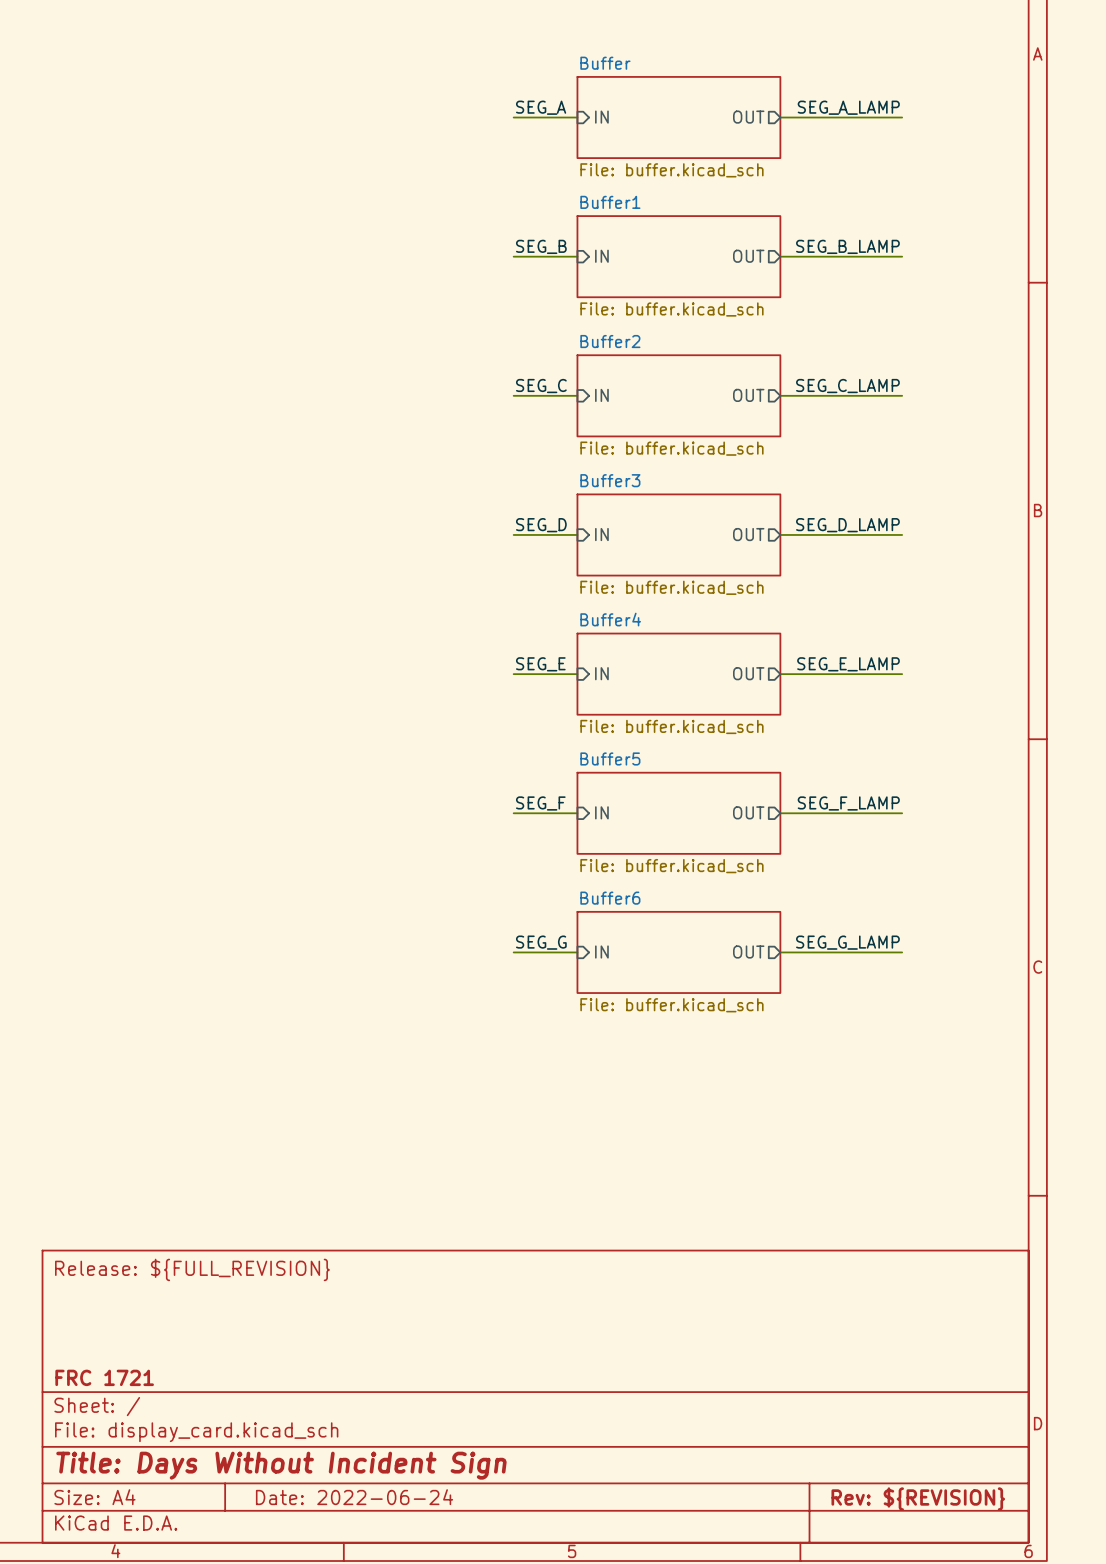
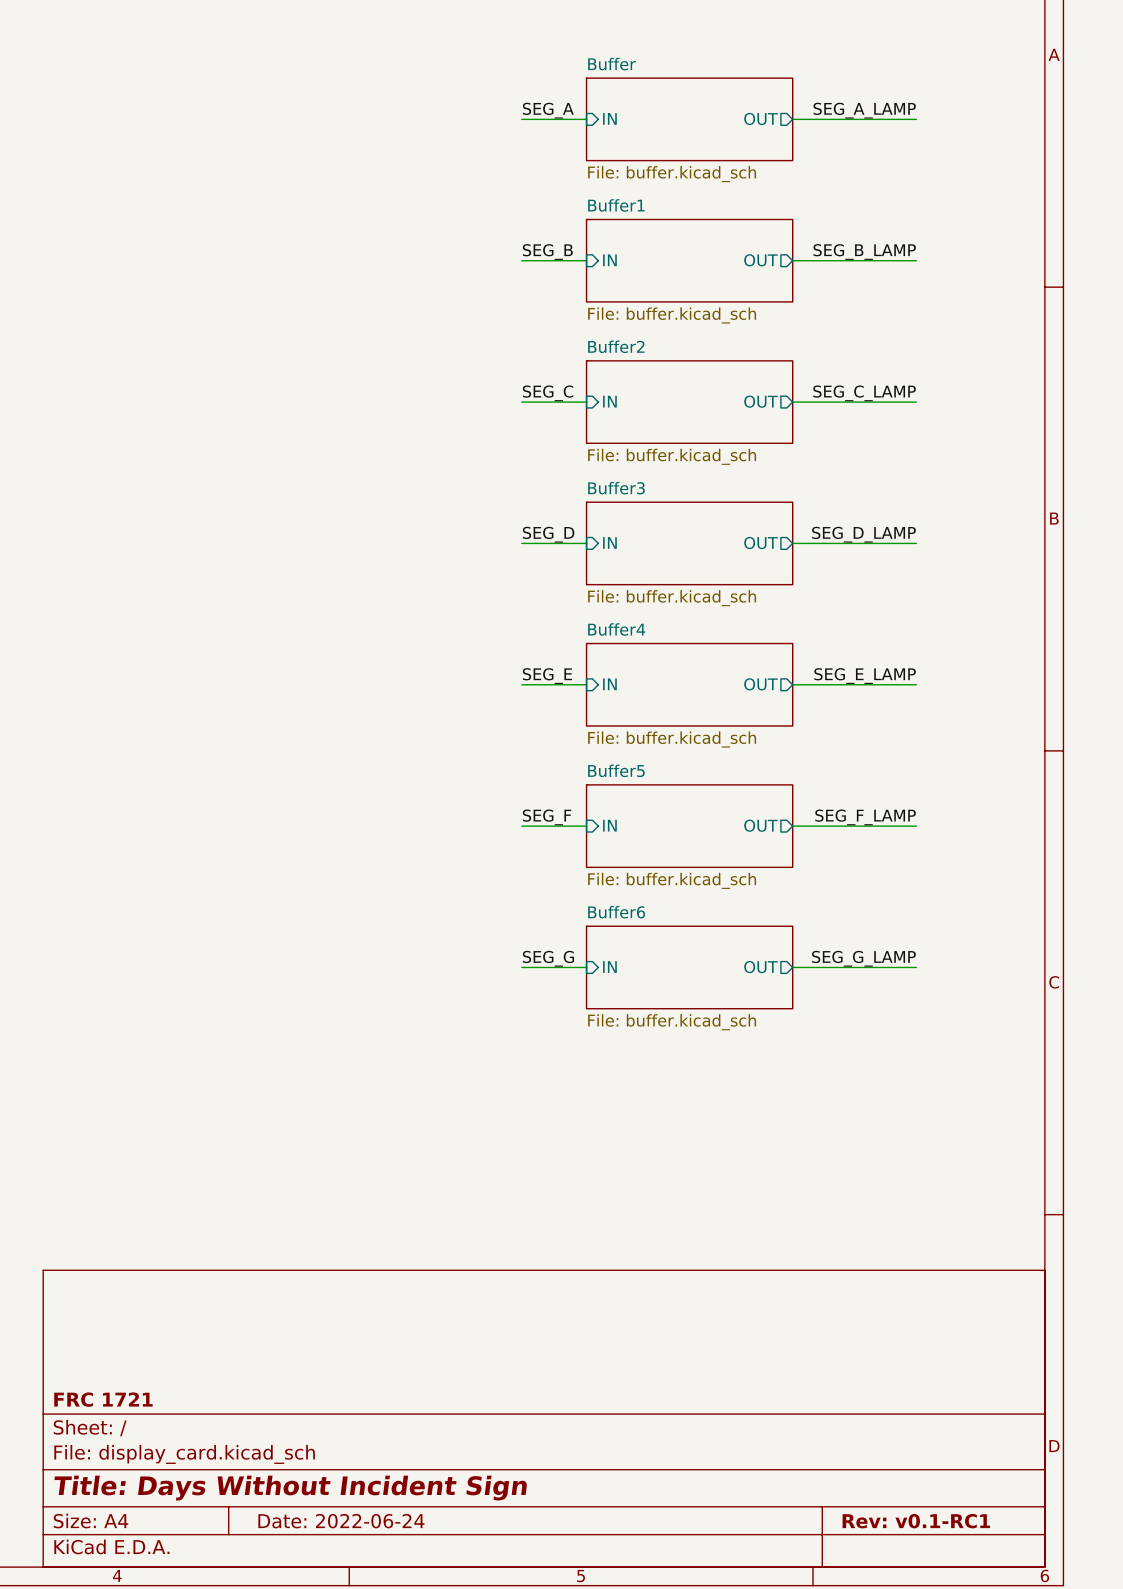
title block: Release: ${FULL_REVISION} (192, 1269) -> none
title block: Rev: ${REVISION} (918, 1499) -> Rev: v0.1-RC1 (916, 1521)

